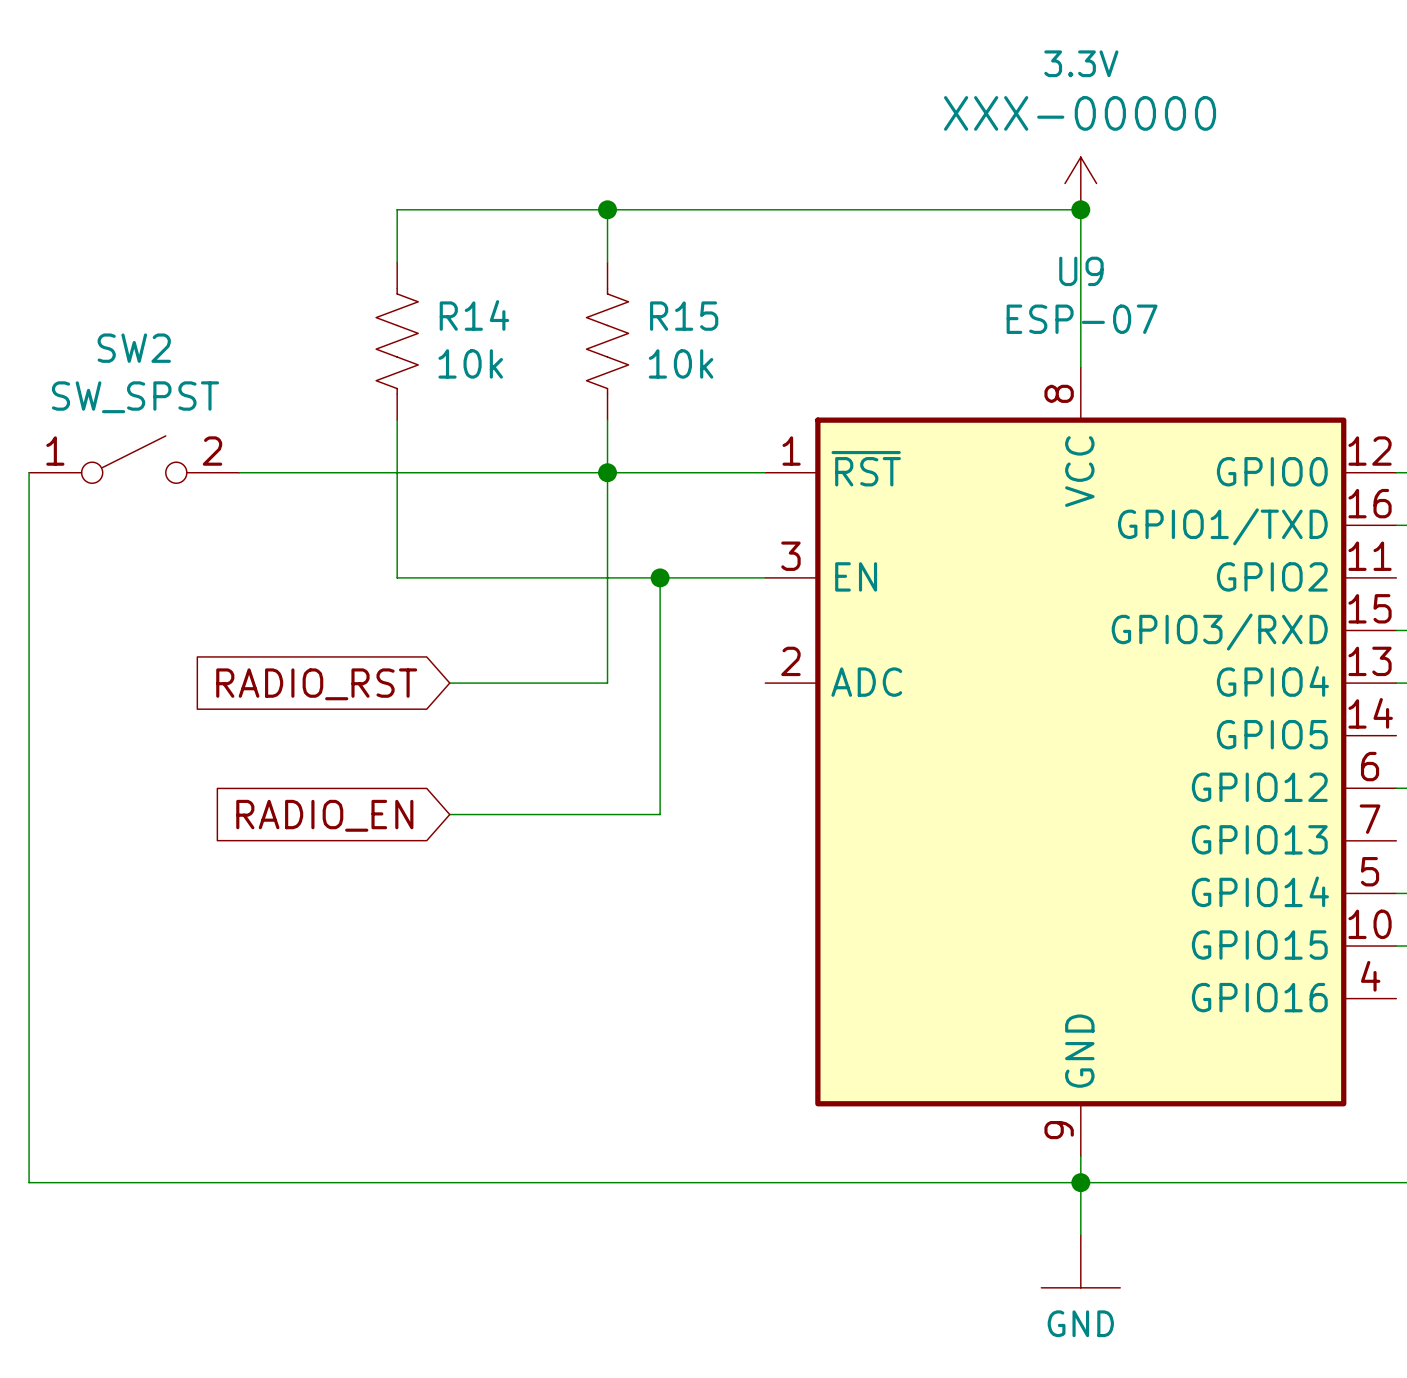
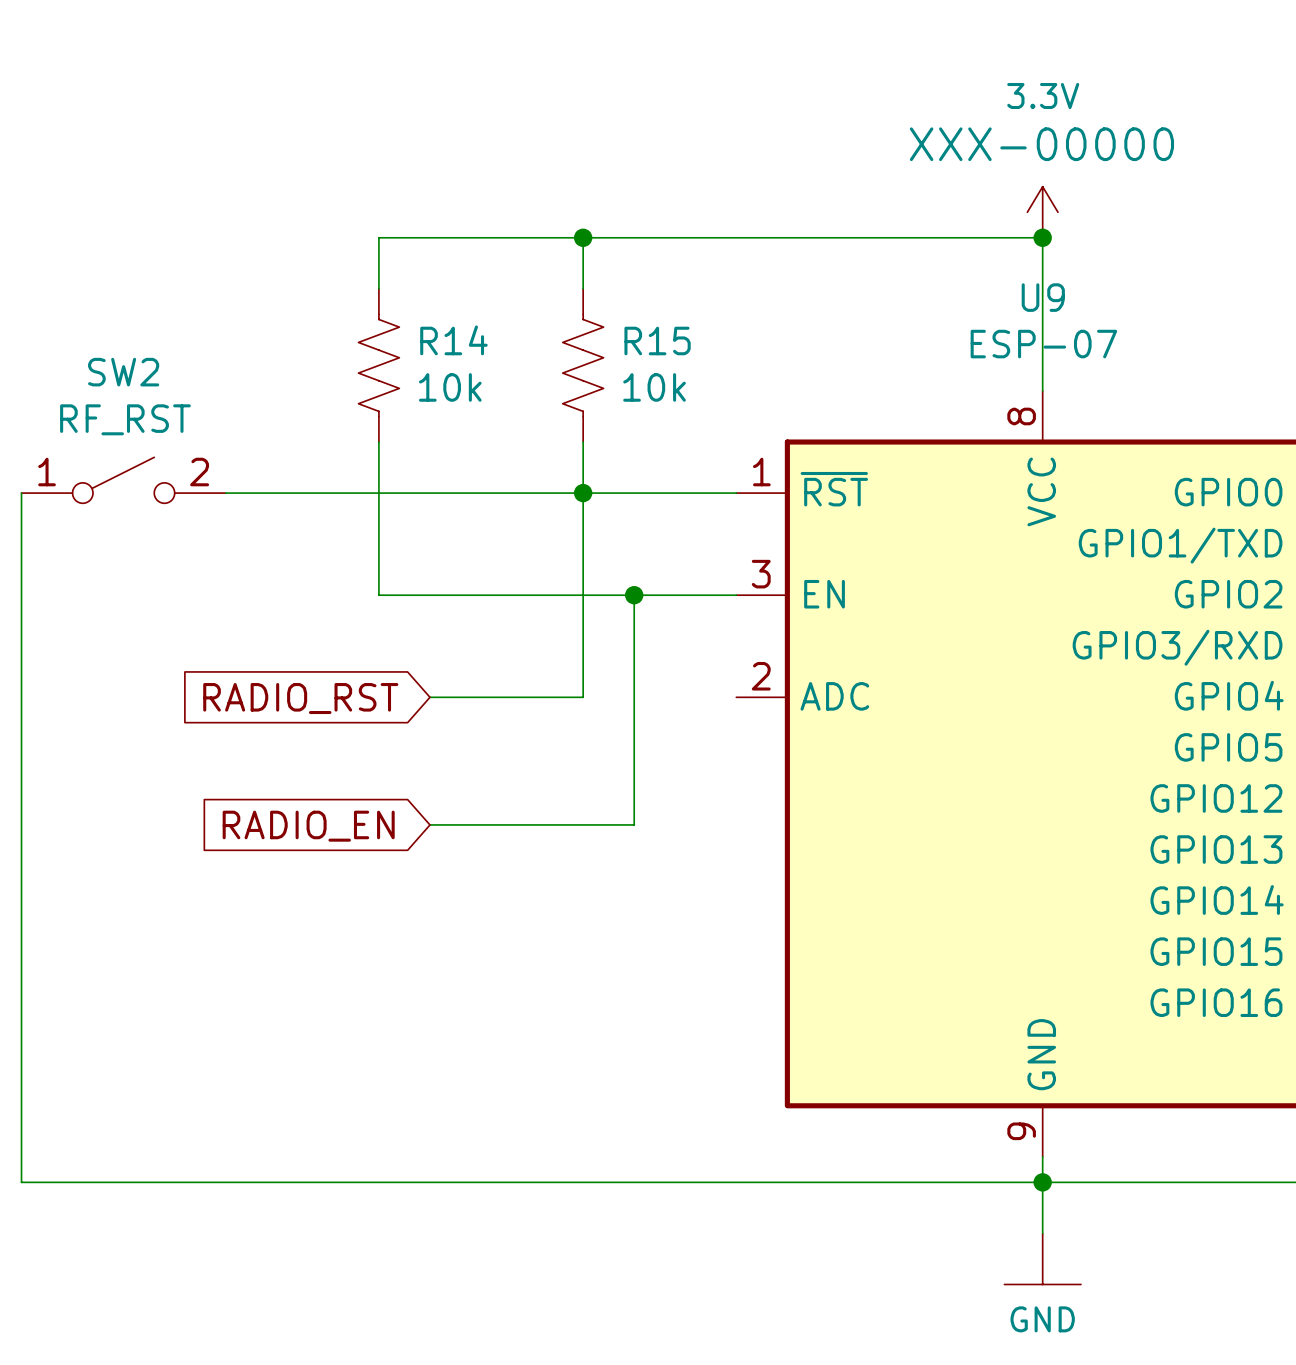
SW2 value: SW_SPST (135, 397) -> RF_RST (125, 419)

